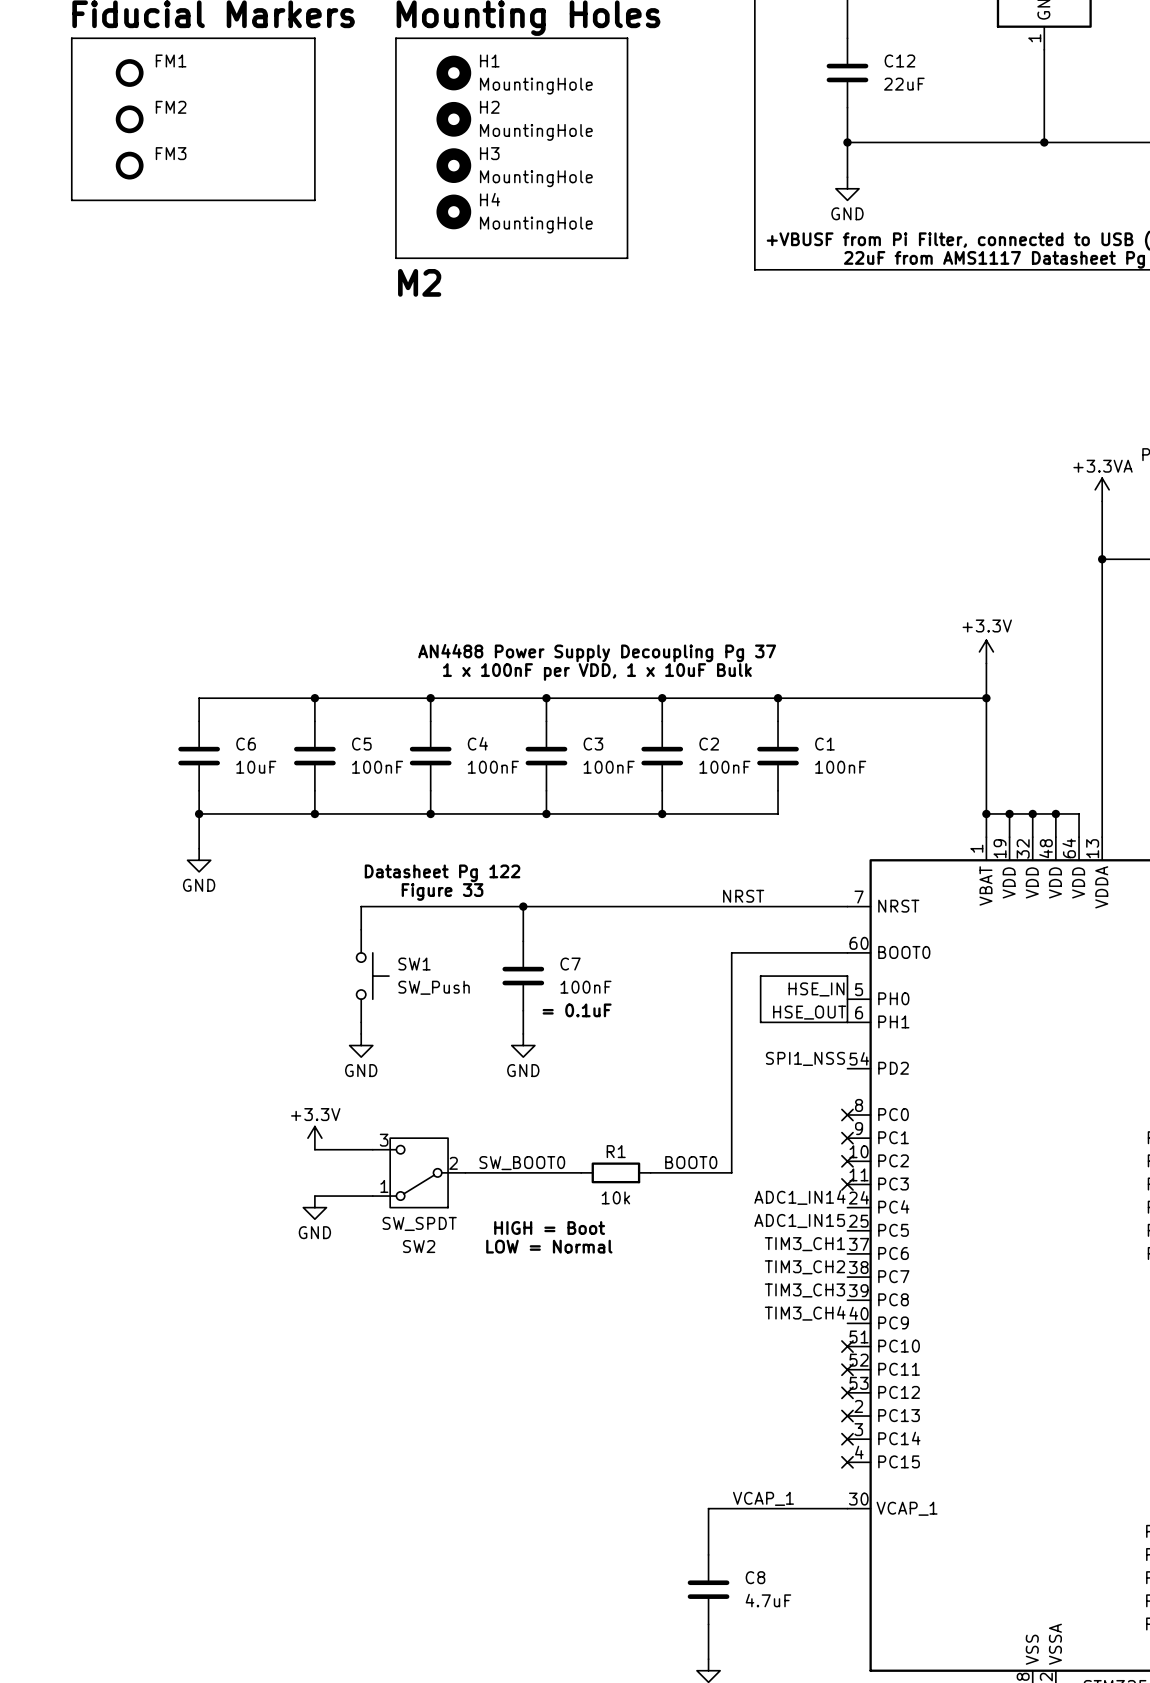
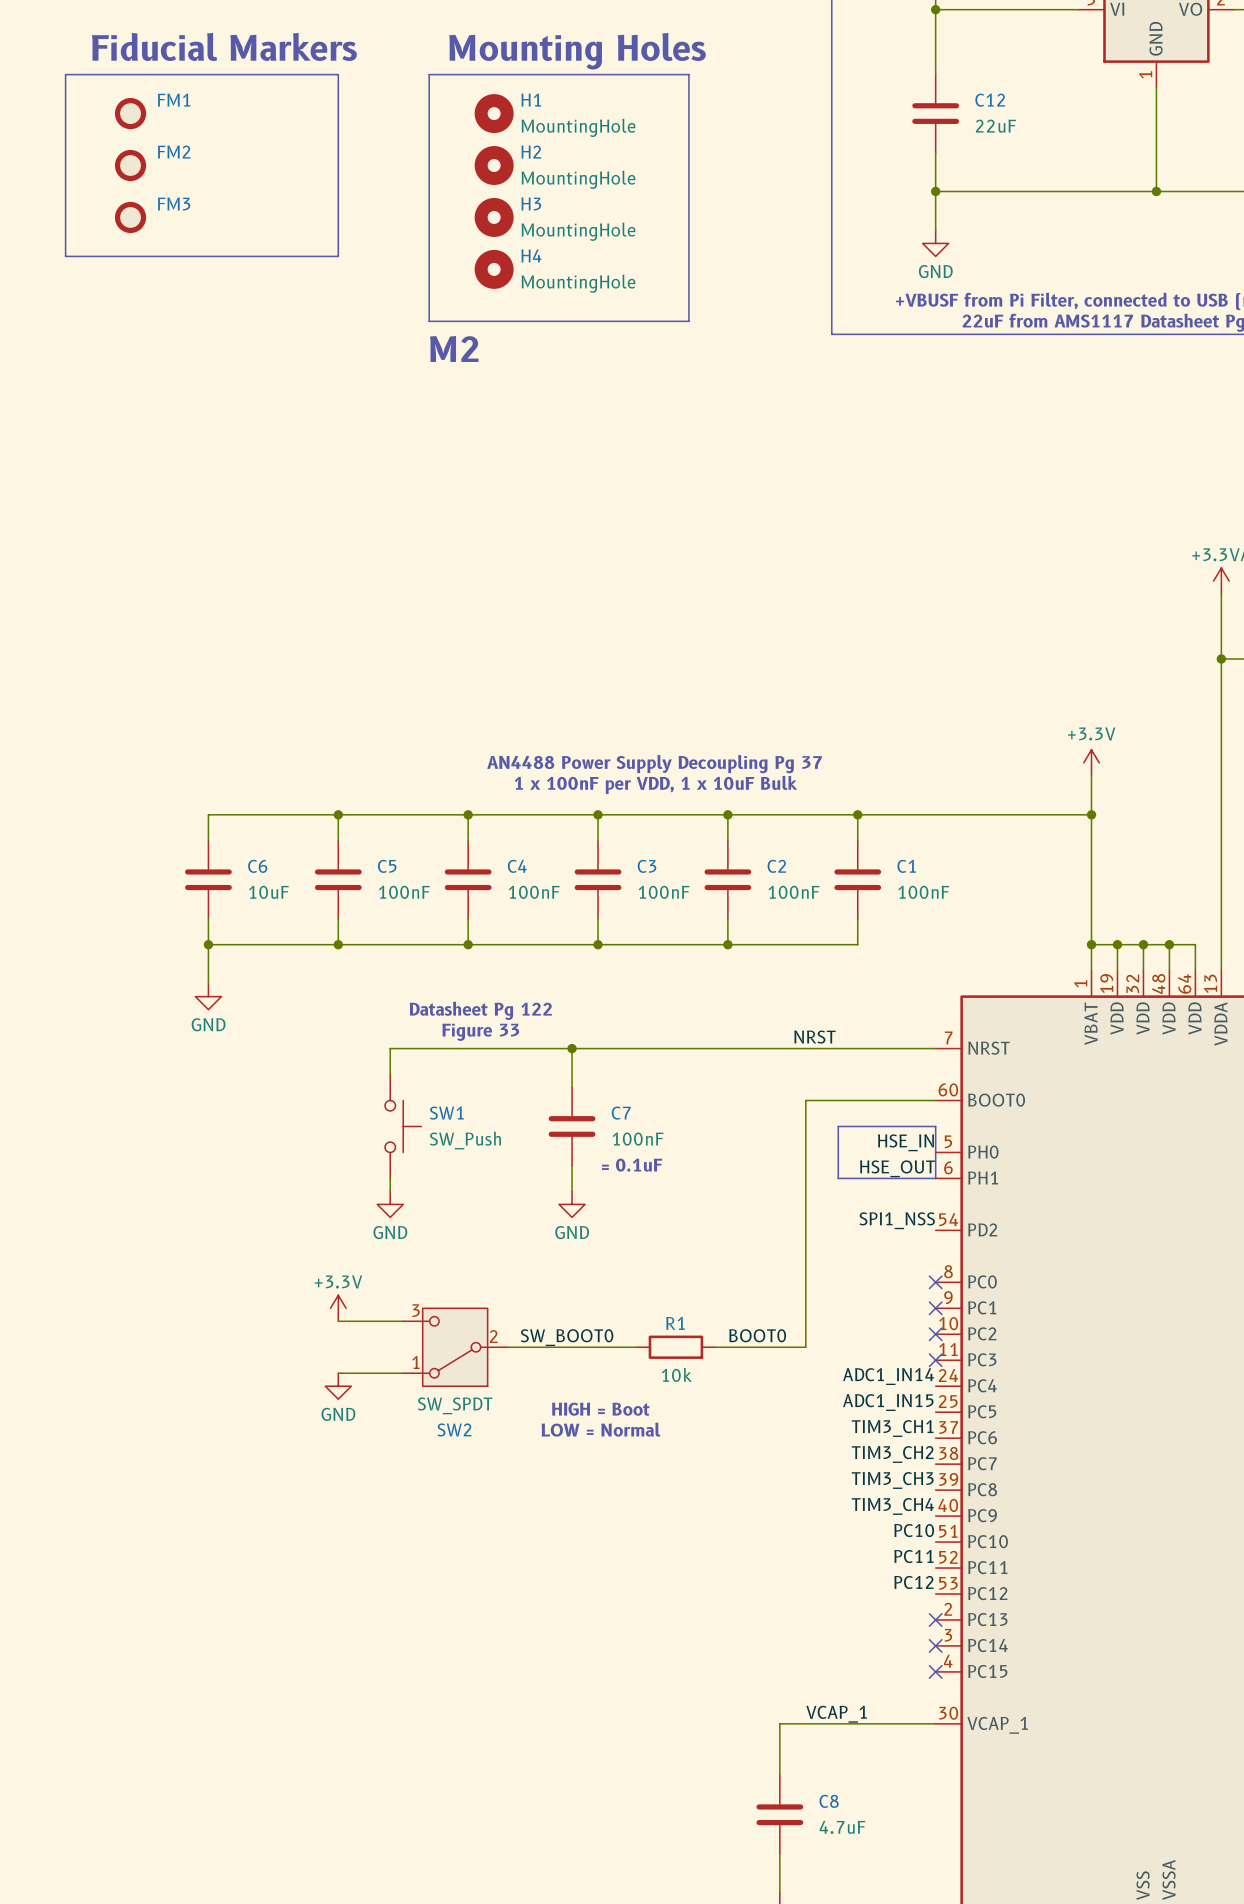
label: none -> PC10 (914, 1530)
no-connect mark: (847, 1346) -> none
label: none -> PC11 (913, 1556)
no-connect mark: (847, 1369) -> none
label: none -> PC12 (913, 1582)
no-connect mark: (847, 1392) -> none

